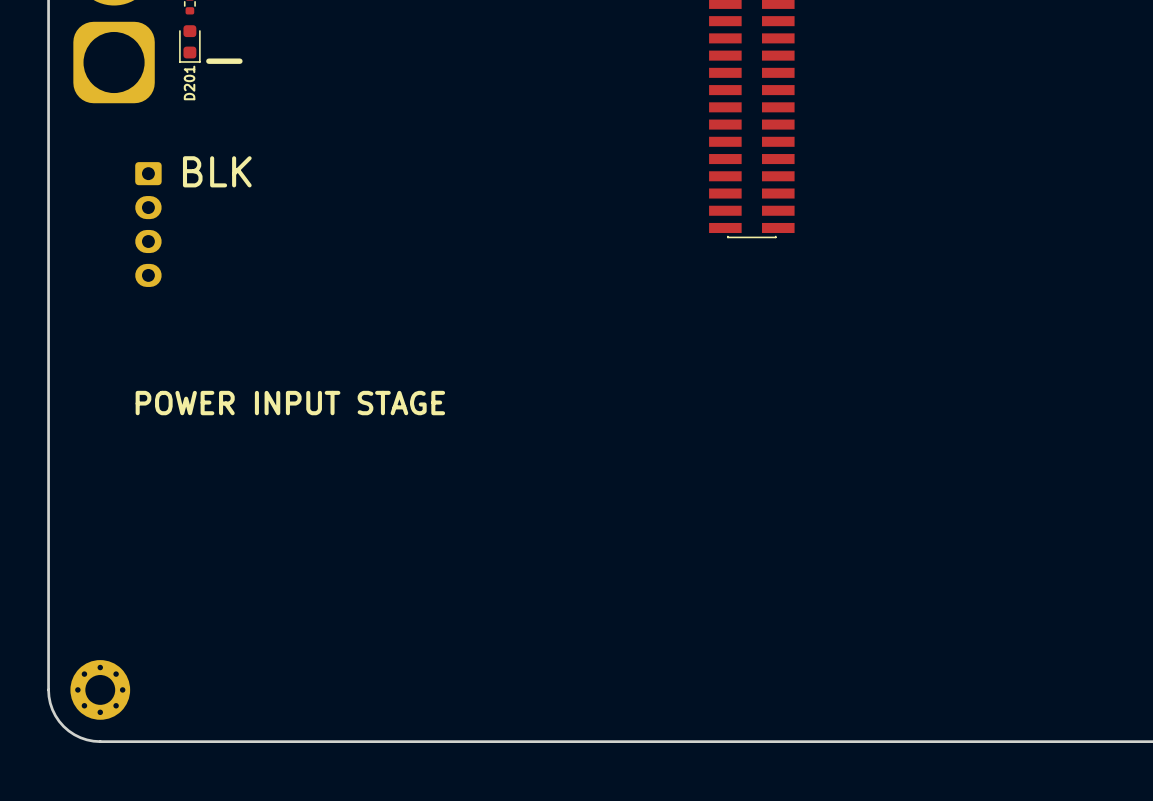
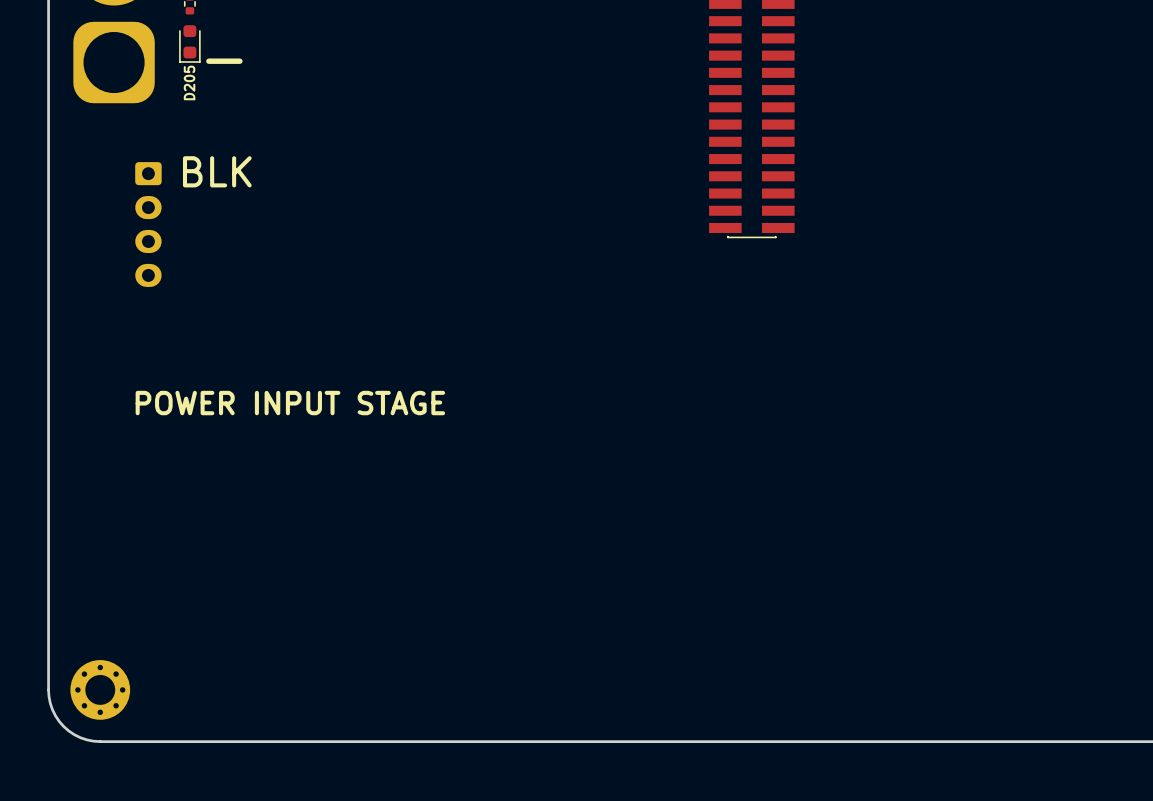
D201 name: D201 (189, 82) -> D205 (189, 82)

